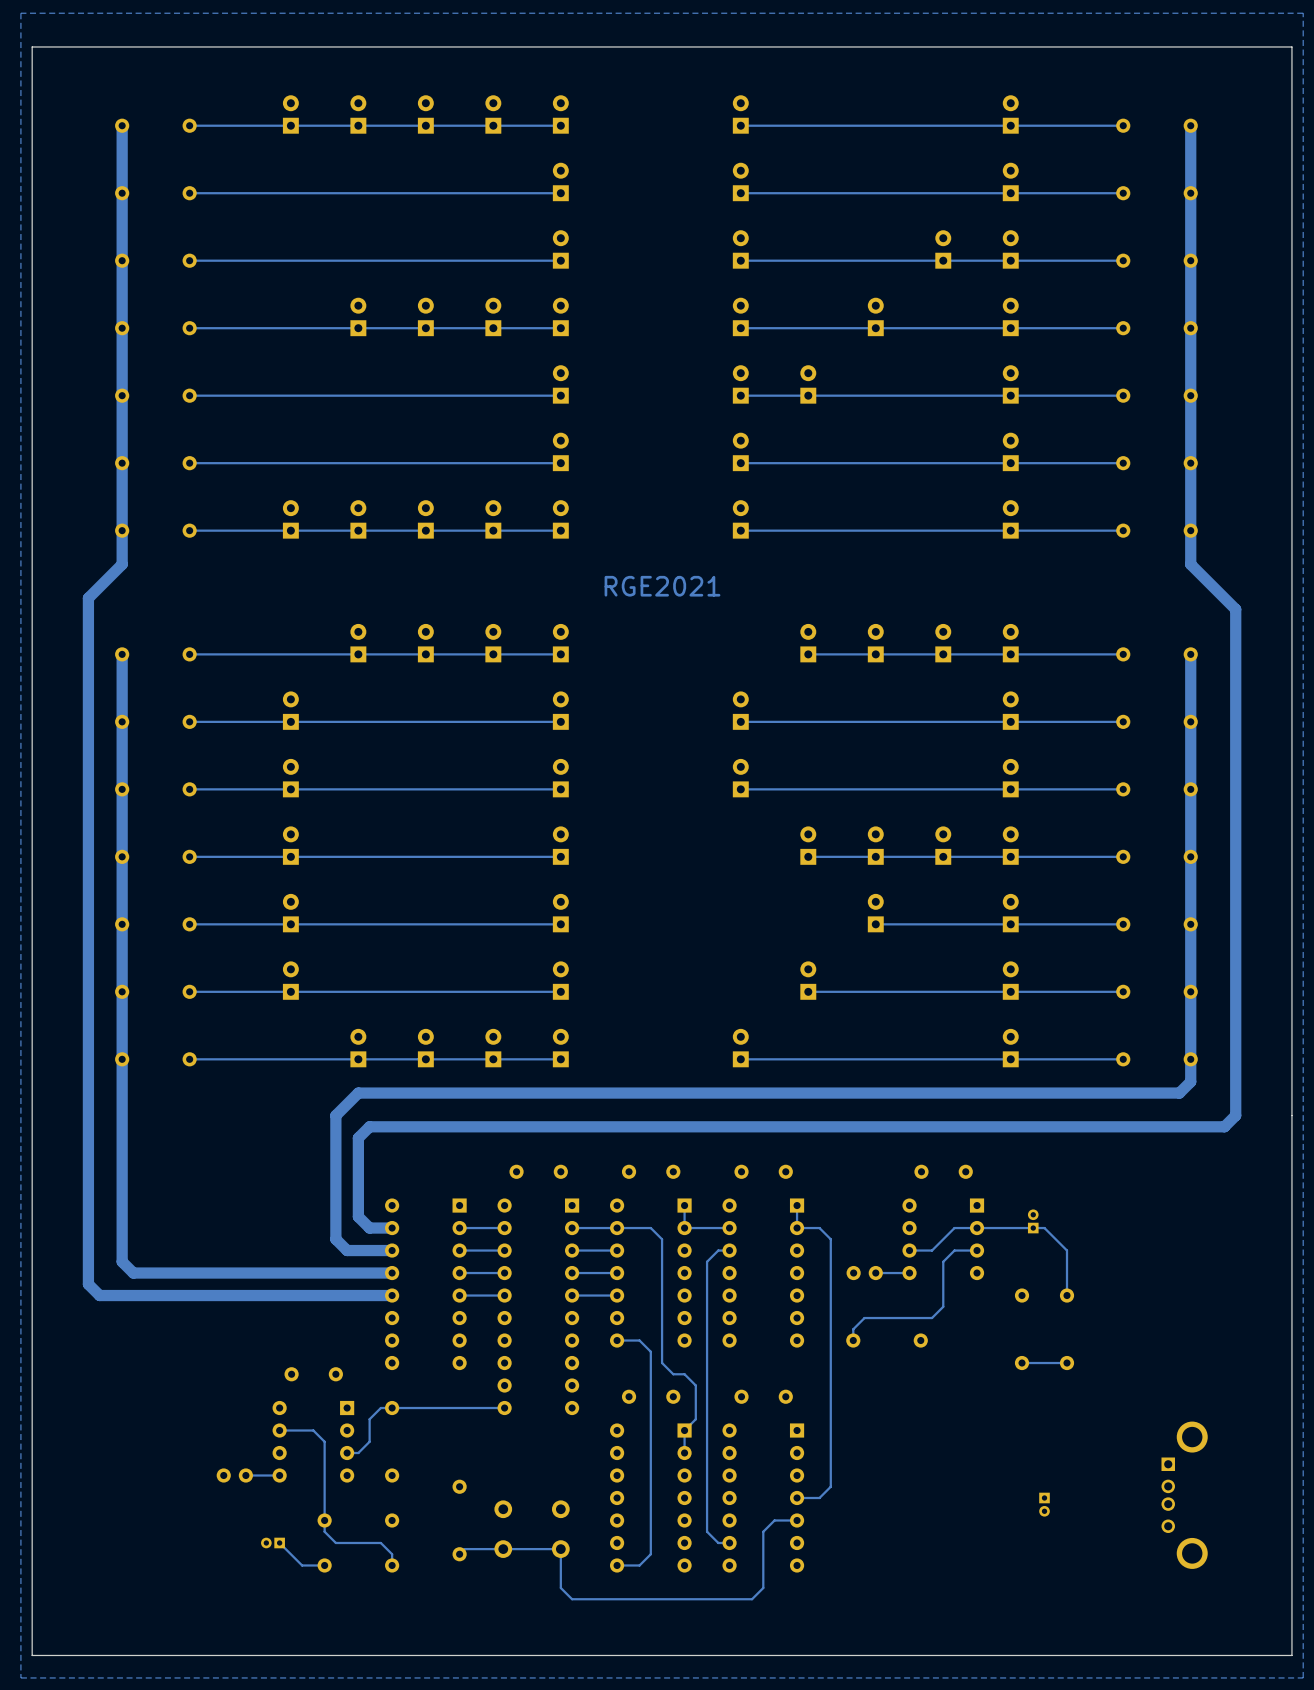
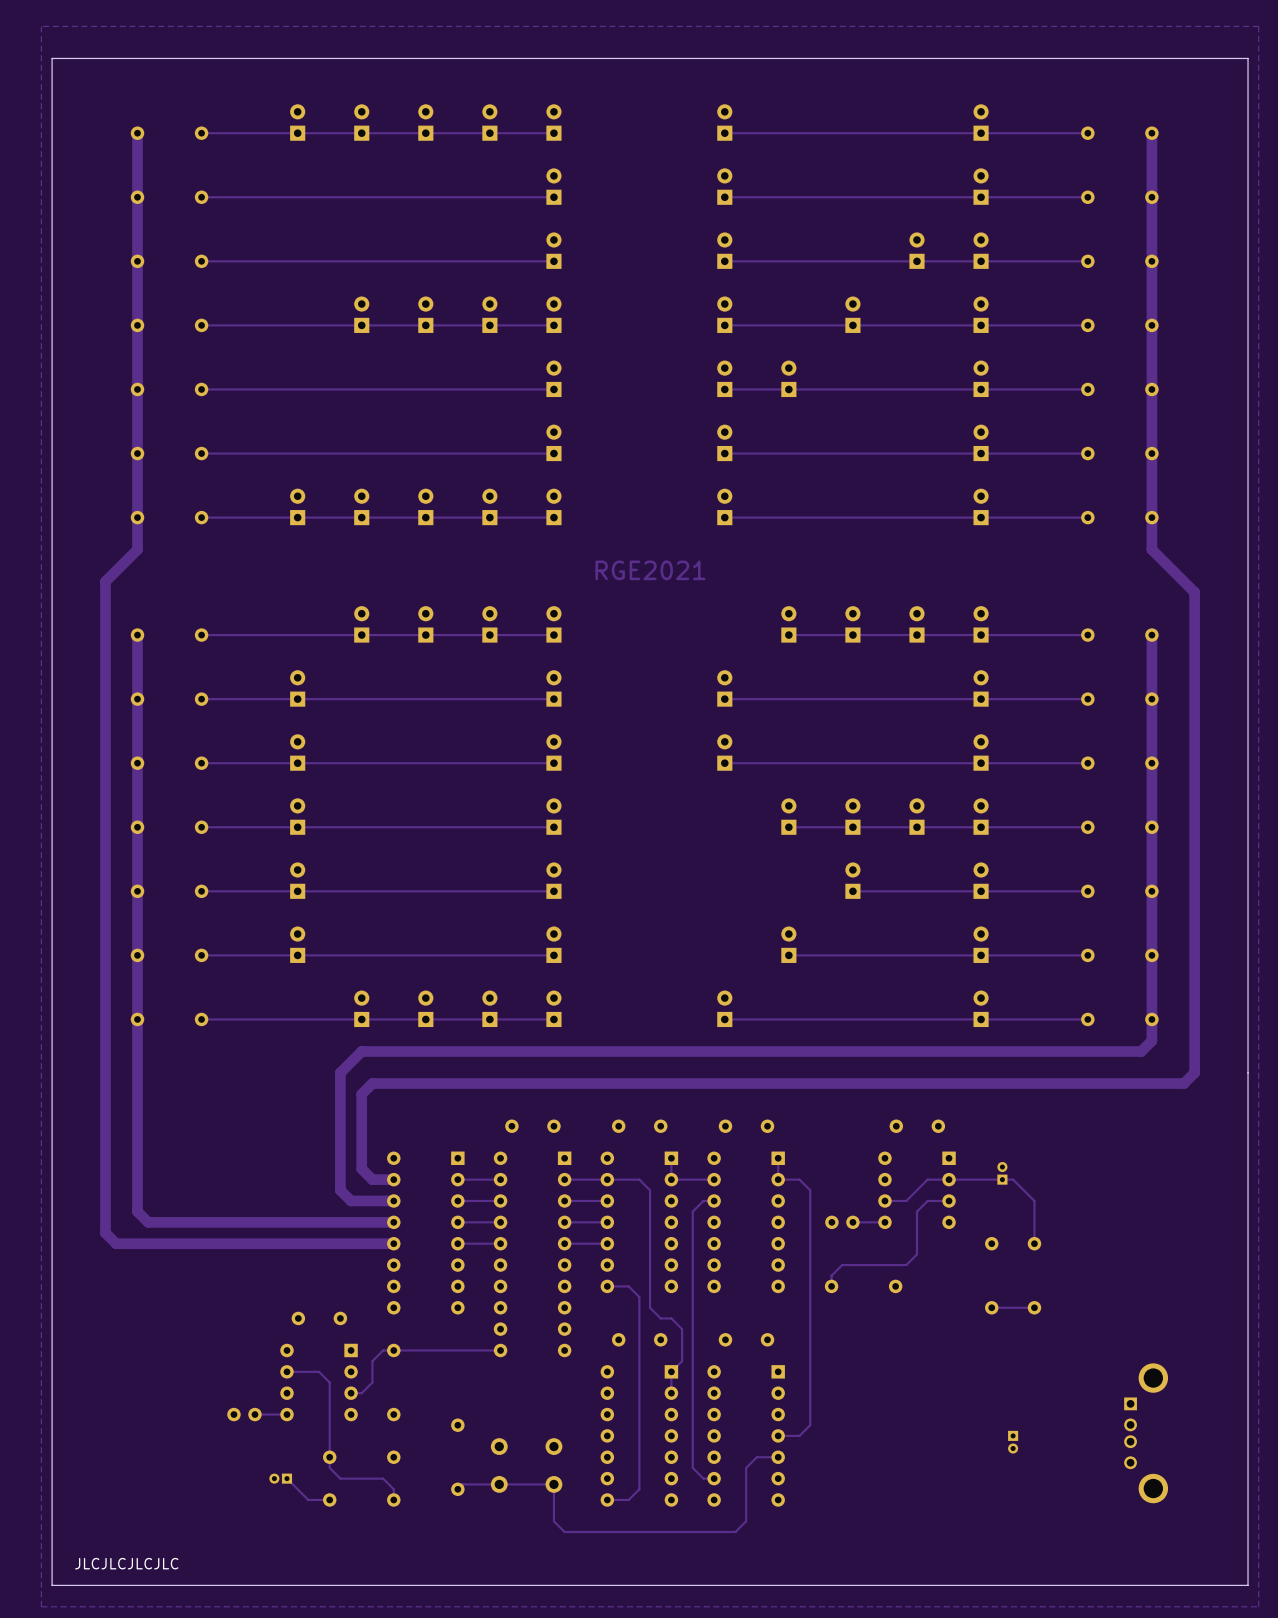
text: none -> JLCJLCJLCJLC (126, 1563)

